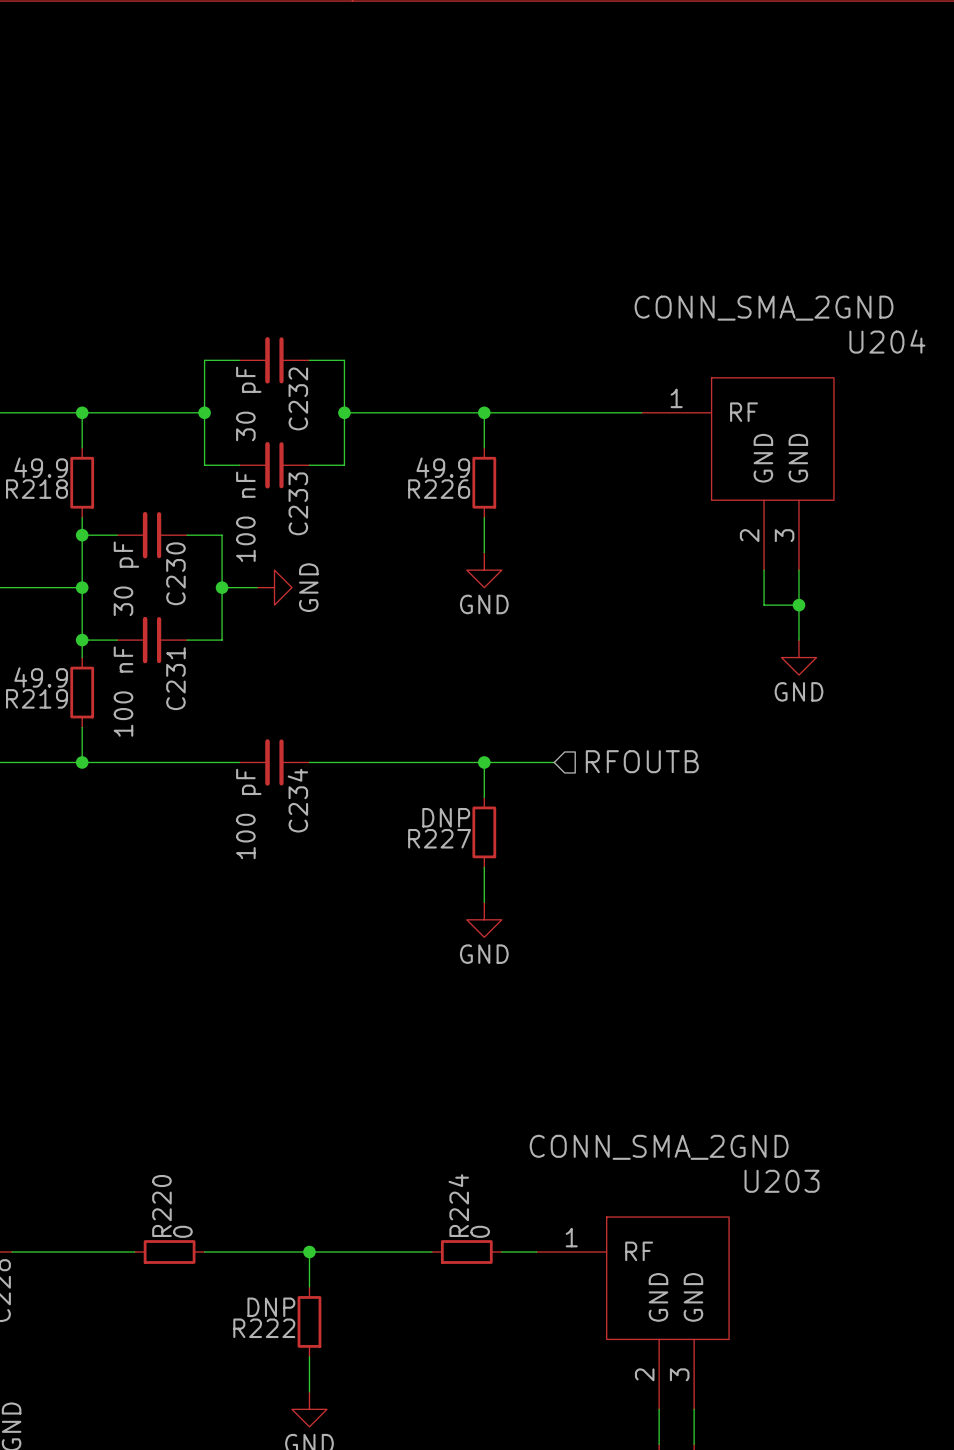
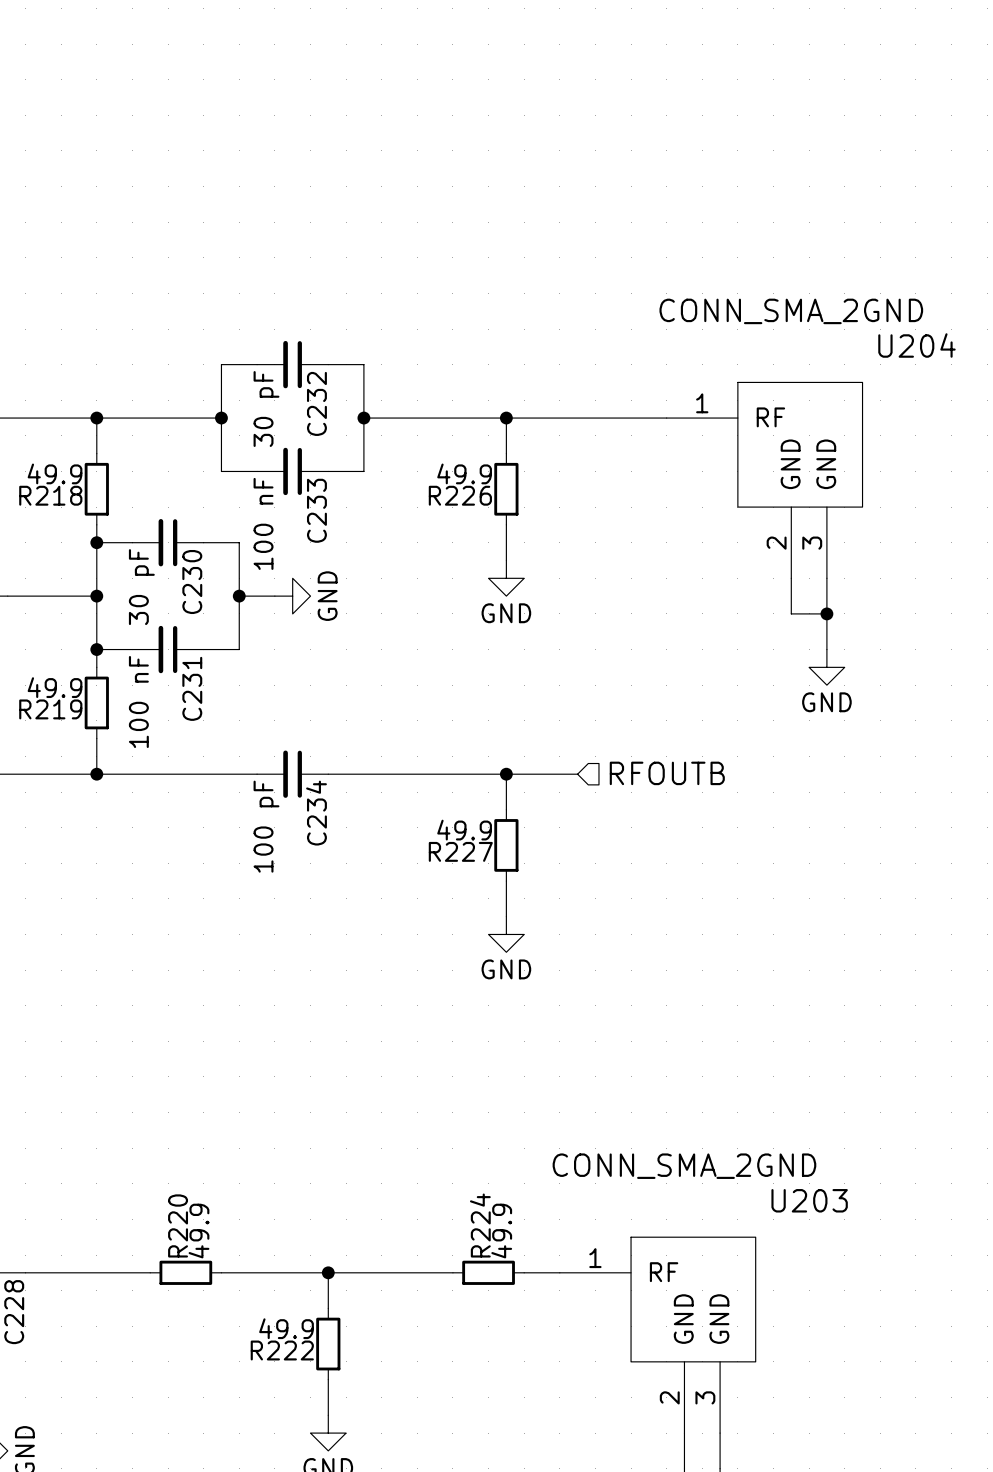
R227 value: DNP (446, 817) -> 49.9 (464, 830)
R220 value: 0 (182, 1231) -> 49.9 (198, 1231)
R224 value: 0 (480, 1231) -> 49.9 (501, 1231)
R222 value: DNP (271, 1307) -> 49.9 (286, 1328)

